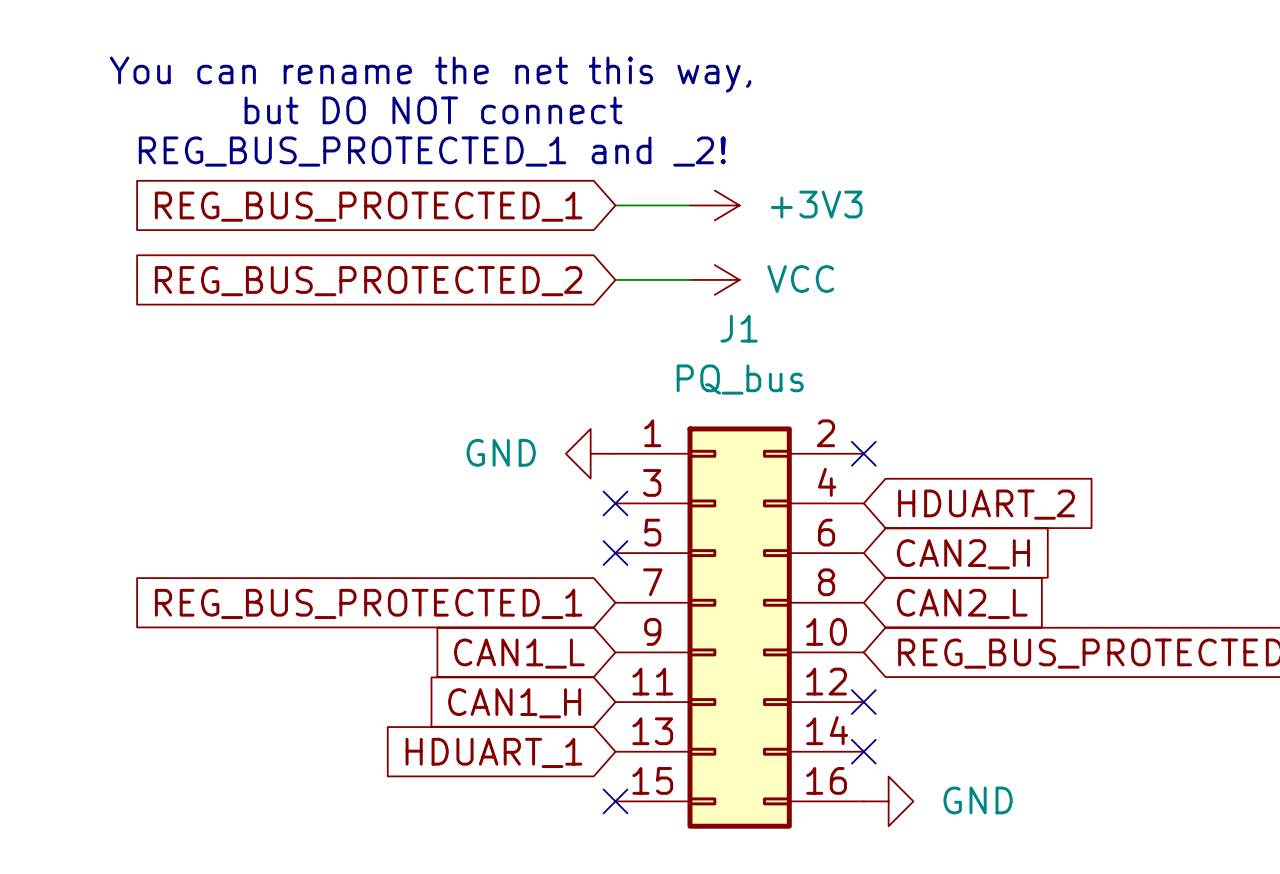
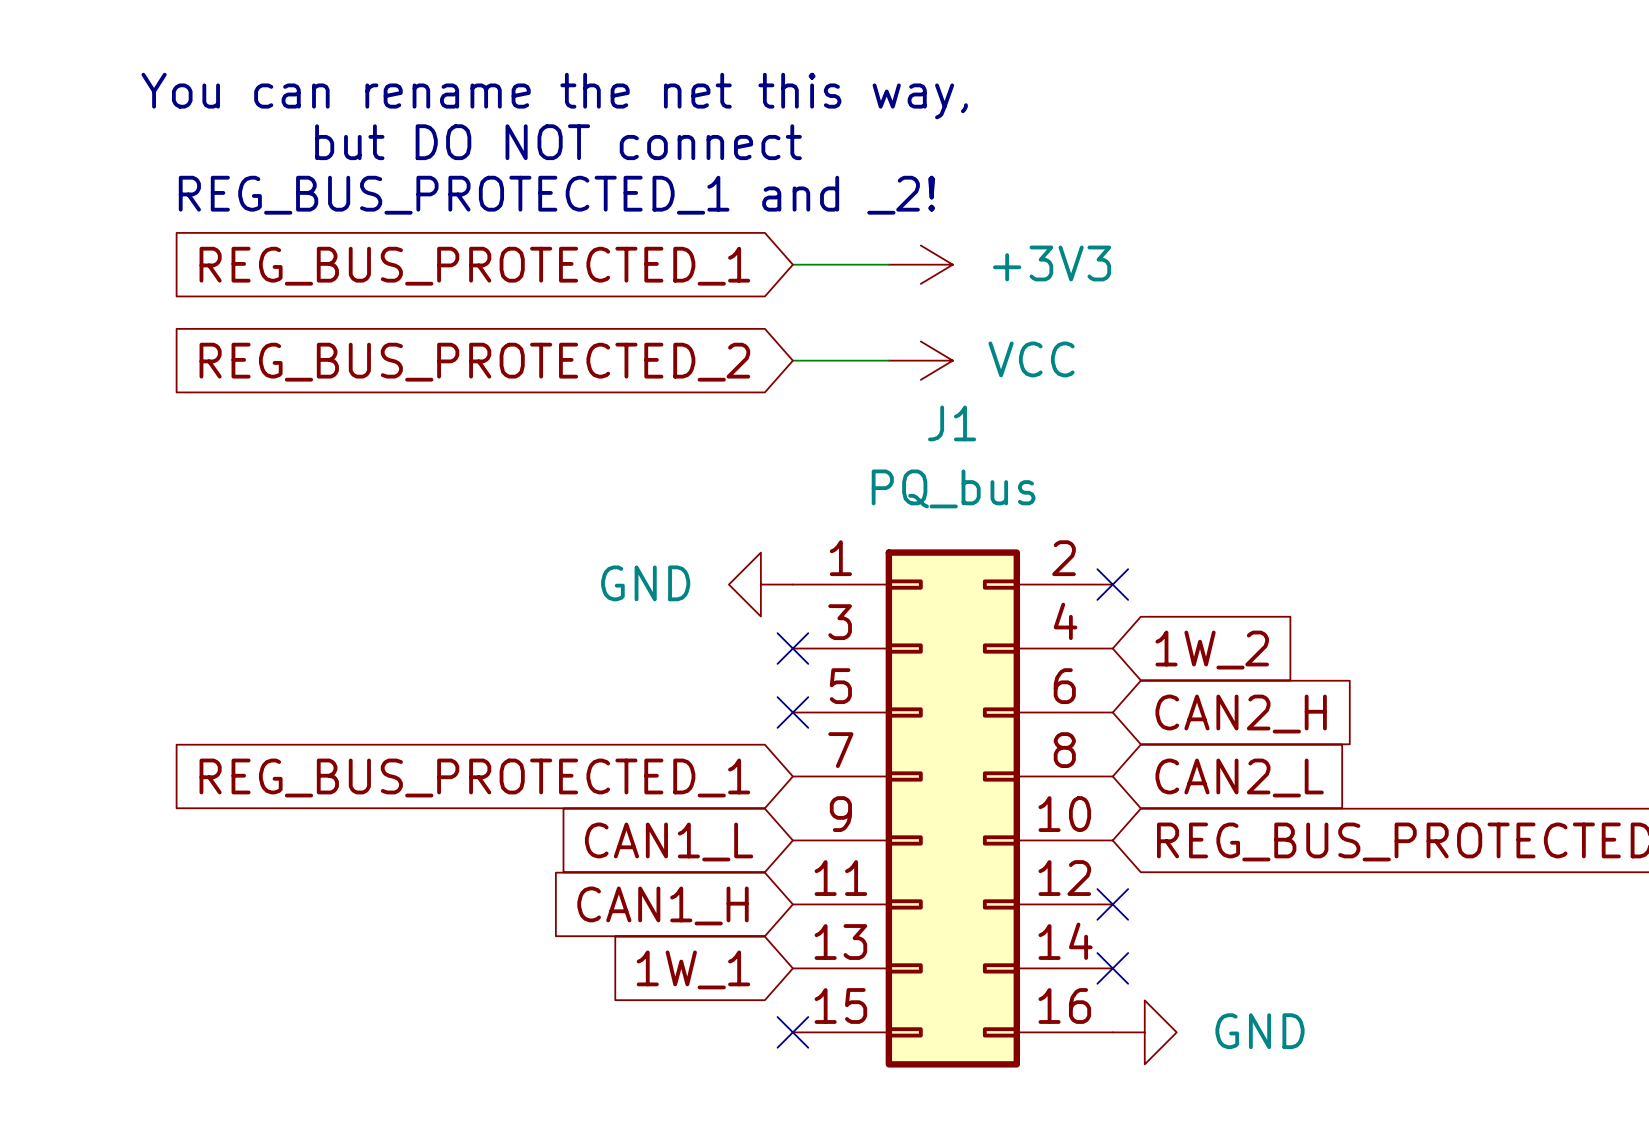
global label: HDUART_2 (986, 504) -> 1W_2 (1212, 650)
global label: HDUART_1 (493, 752) -> 1W_1 (693, 969)

